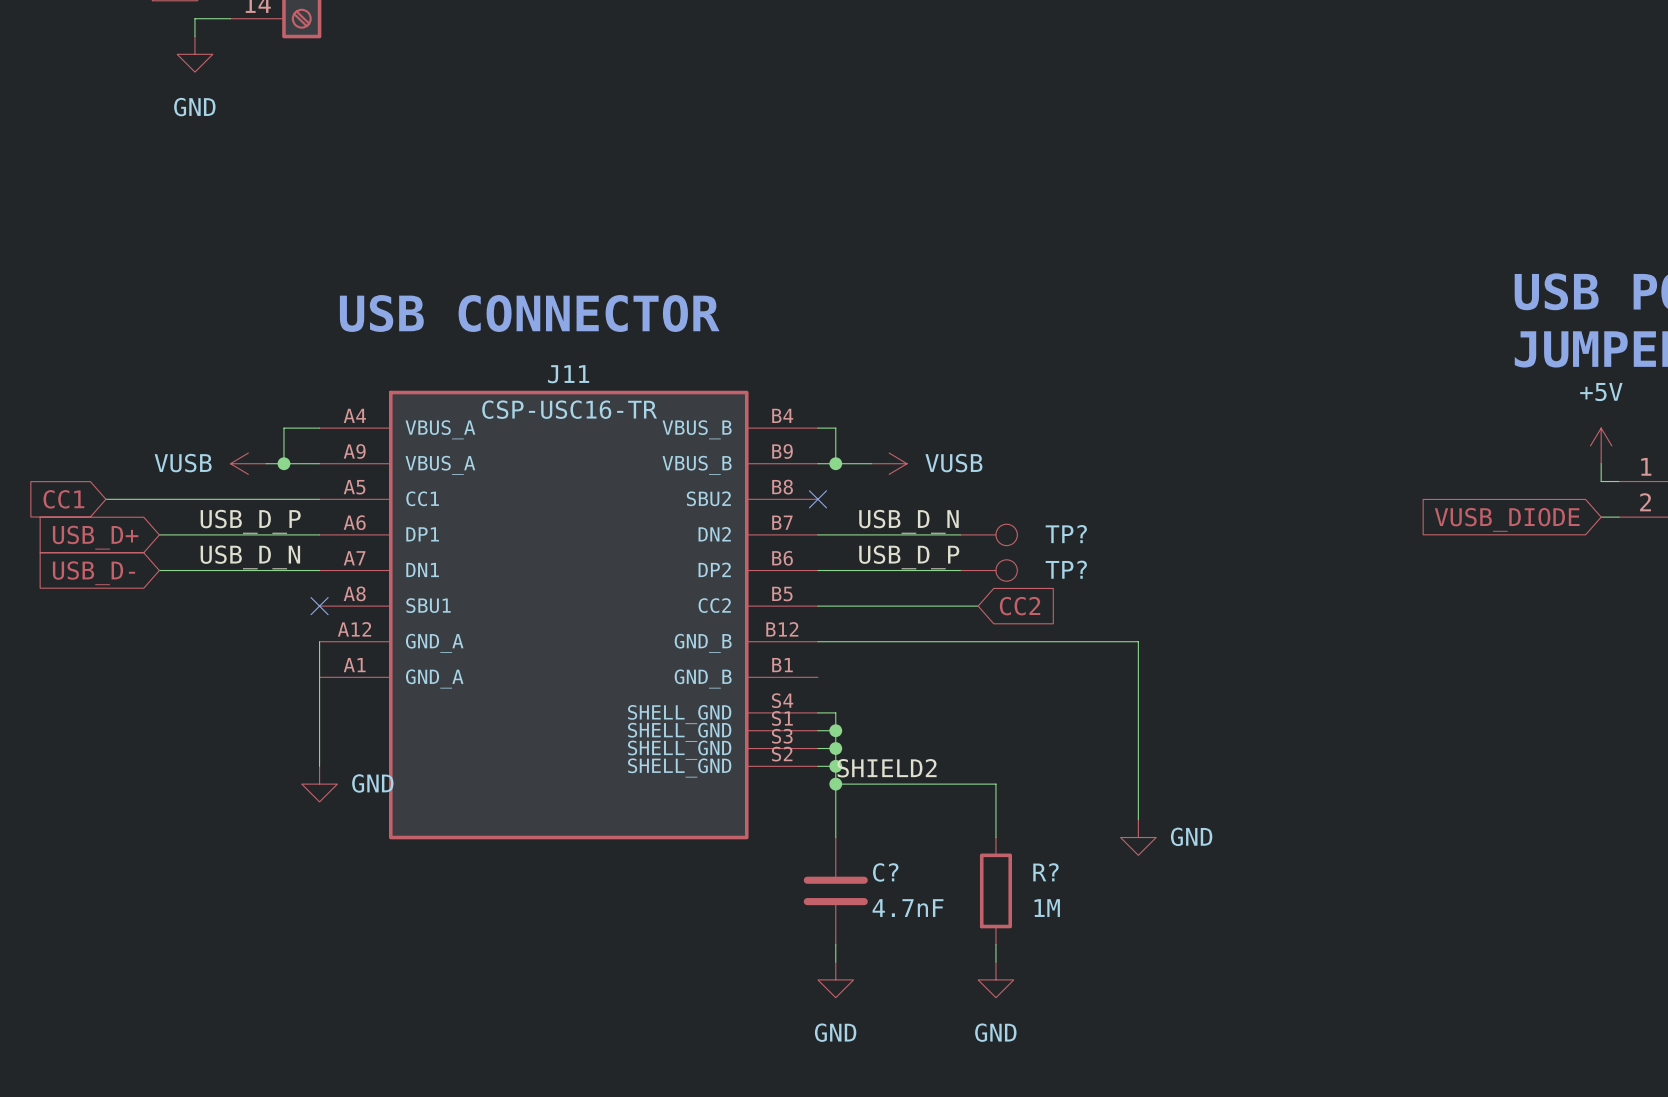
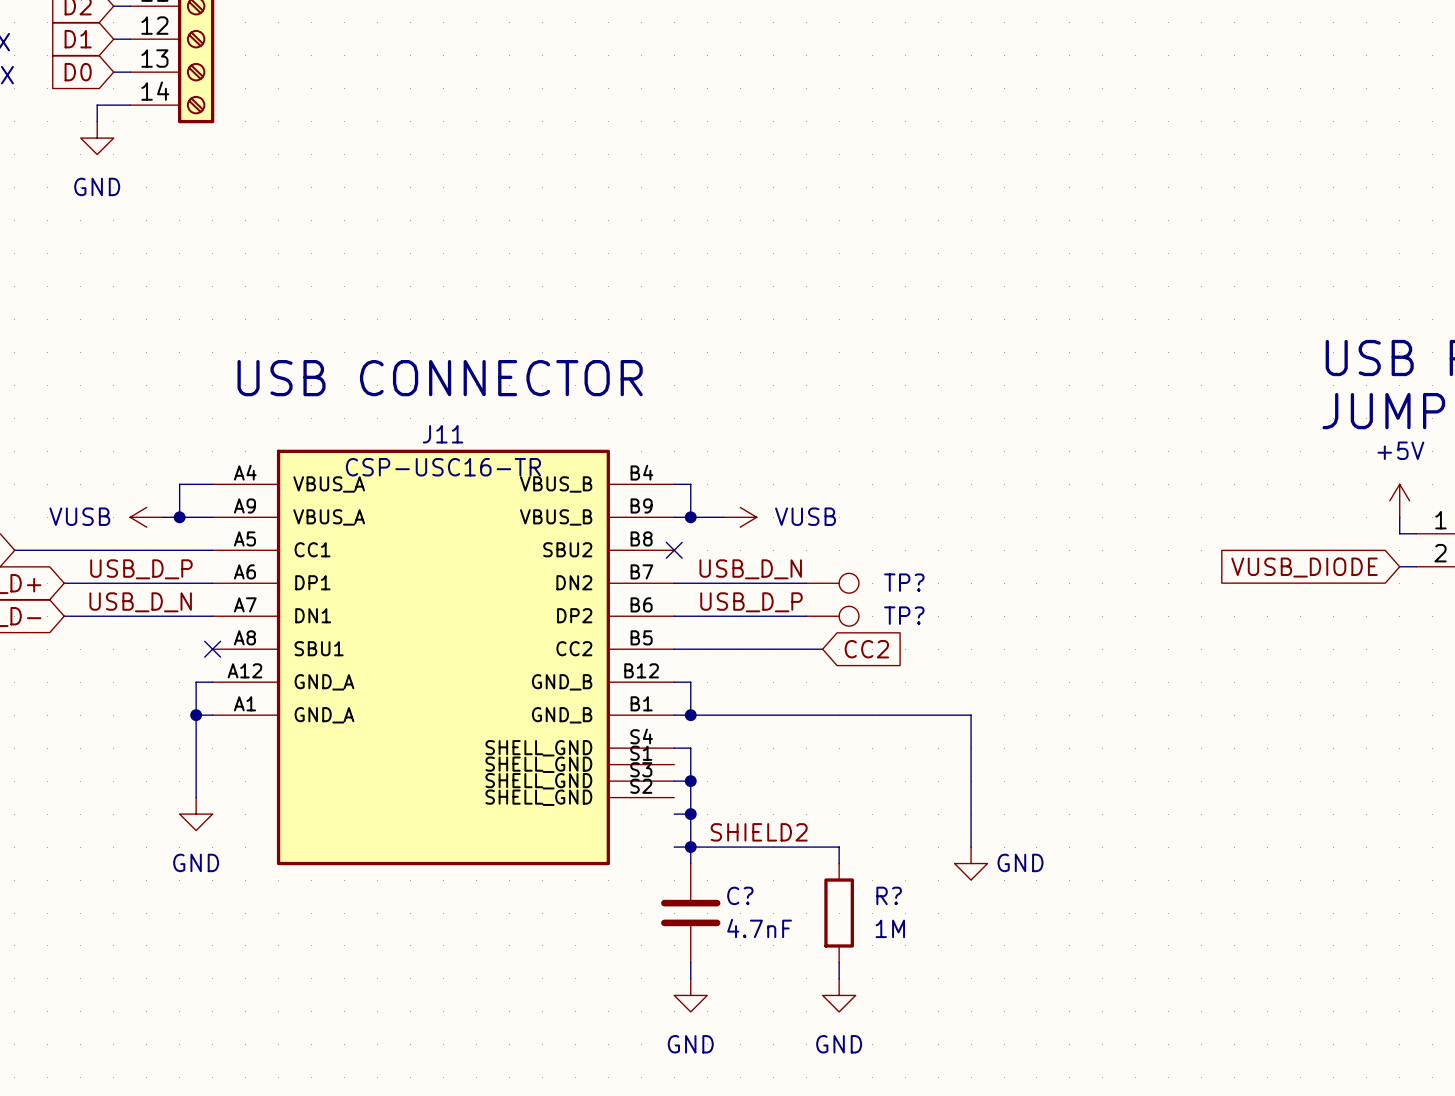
wire: (319, 641) (319, 766) -> (212, 682) (196, 682) (196, 797)
wire: (835, 641) (1138, 641) (1138, 677) -> (674, 715) (971, 715)
wire: none -> (690, 682) (690, 715)
wire: none -> (196, 715) (212, 715)
junction: none -> (196, 715)
junction: none -> (690, 715)
wire: (817, 730) (835, 730) -> none
junction: (835, 730) -> none
wire: (817, 766) (835, 766) -> (674, 814) (690, 814)
junction: (835, 766) -> none
label position: SHIELD2 (887, 768) -> SHIELD2 (759, 832)
power symbol text position: GND (372, 783) -> GND (196, 862)
power symbol position: GND (319, 784) -> GND (196, 814)
wire: (835, 784) (995, 784) (995, 819) -> (674, 847) (839, 847)
junction: none -> (690, 847)

